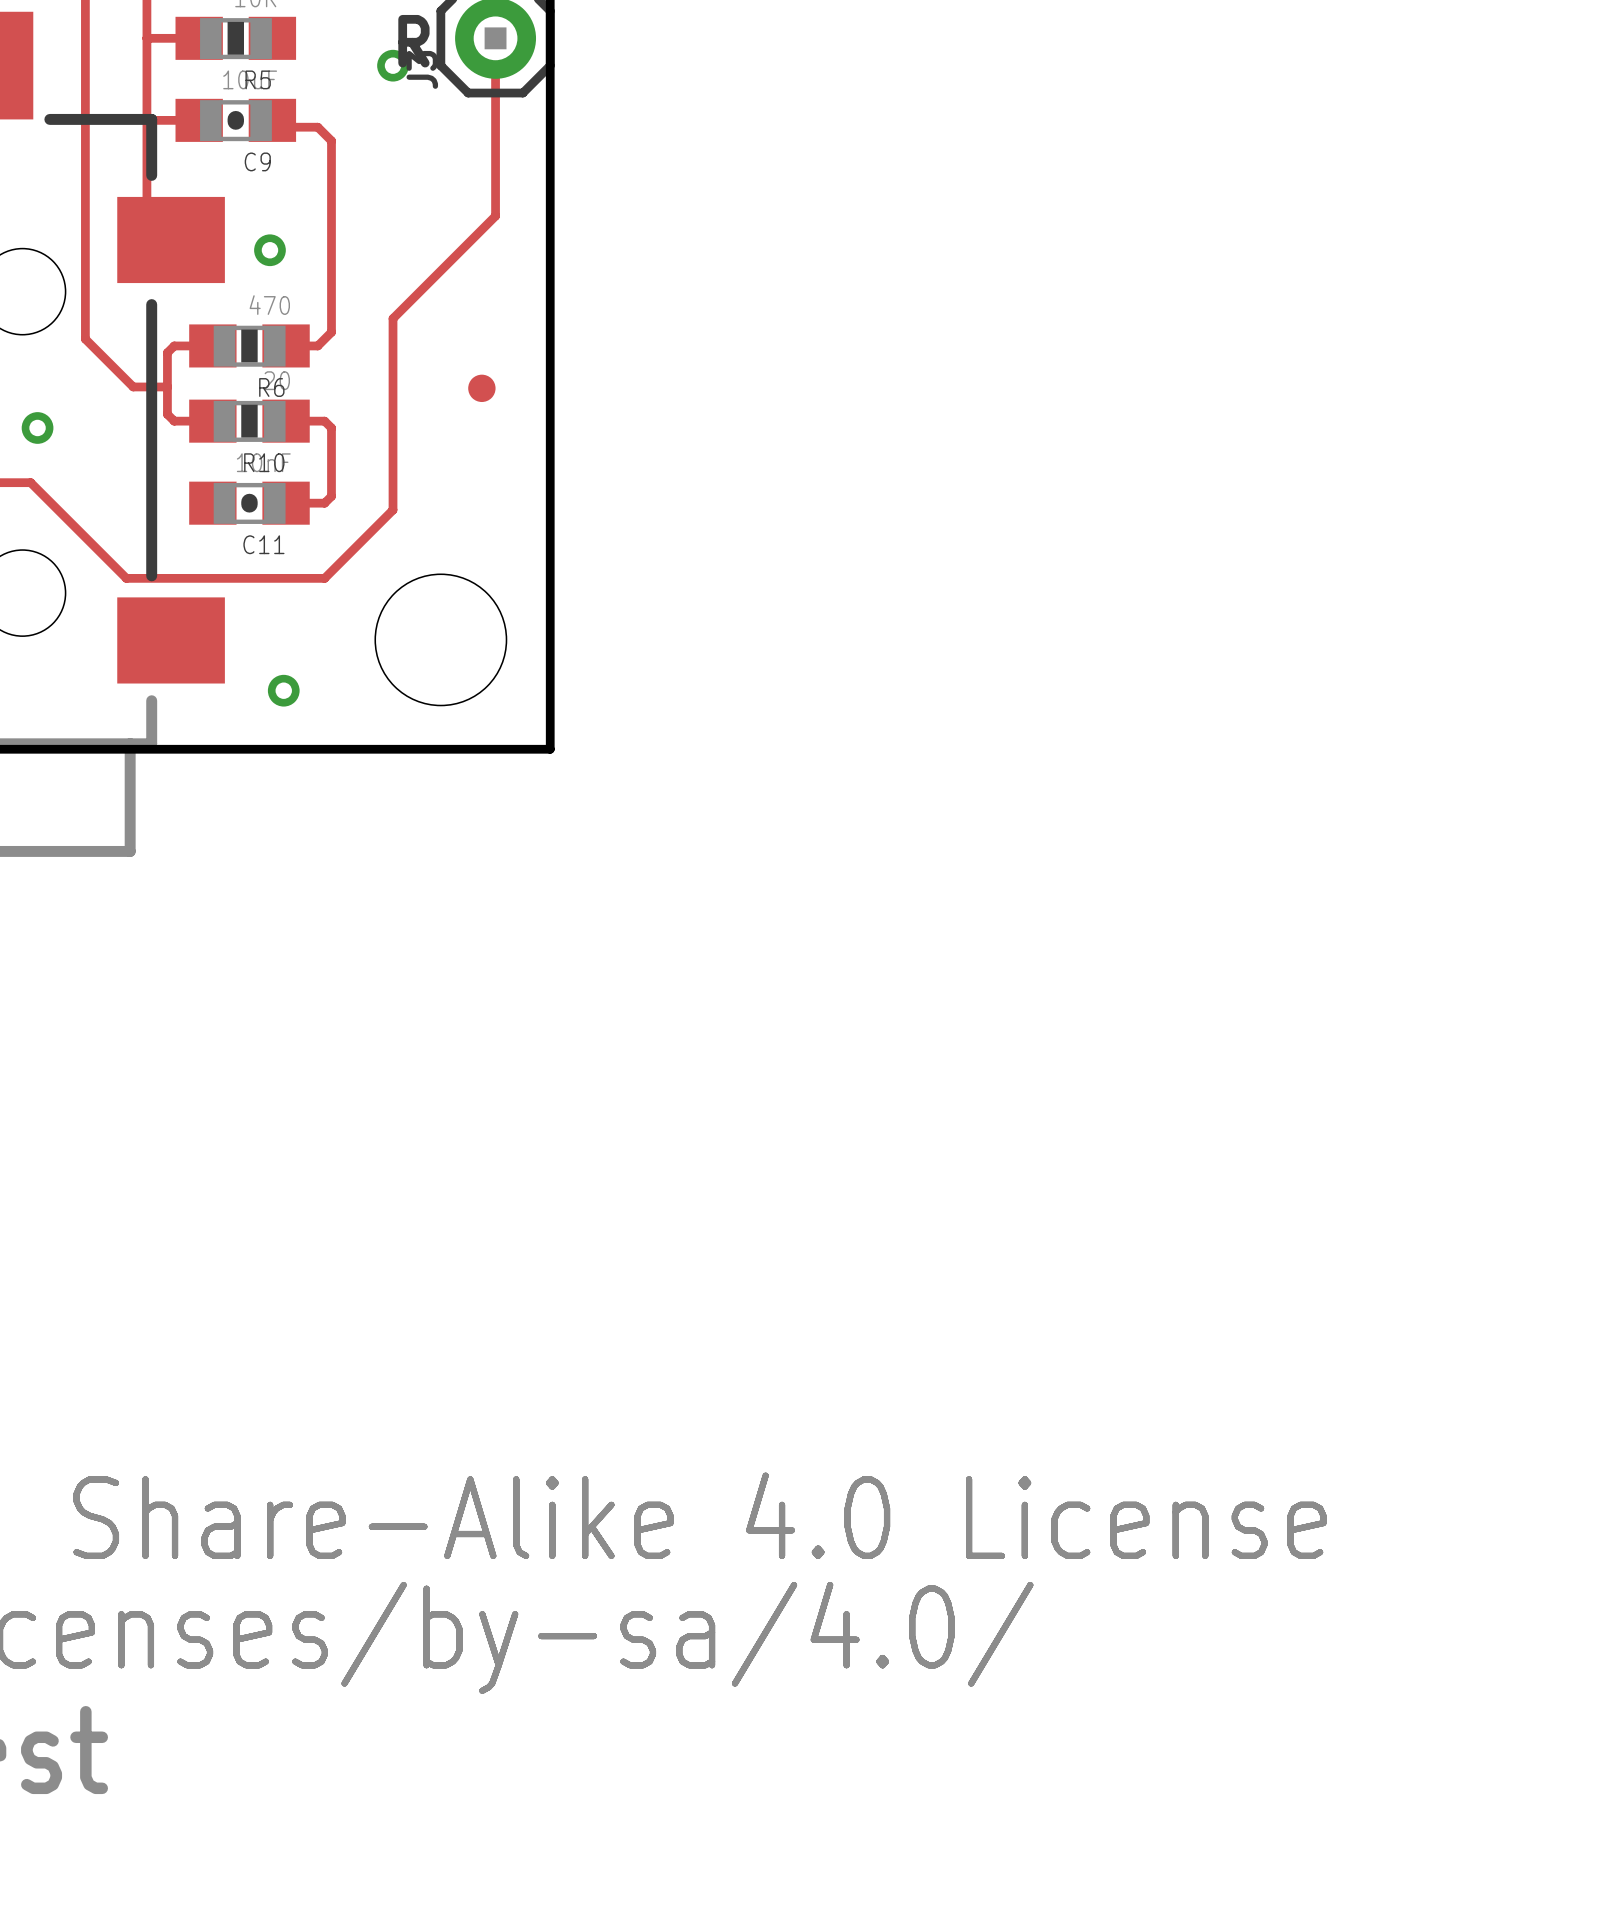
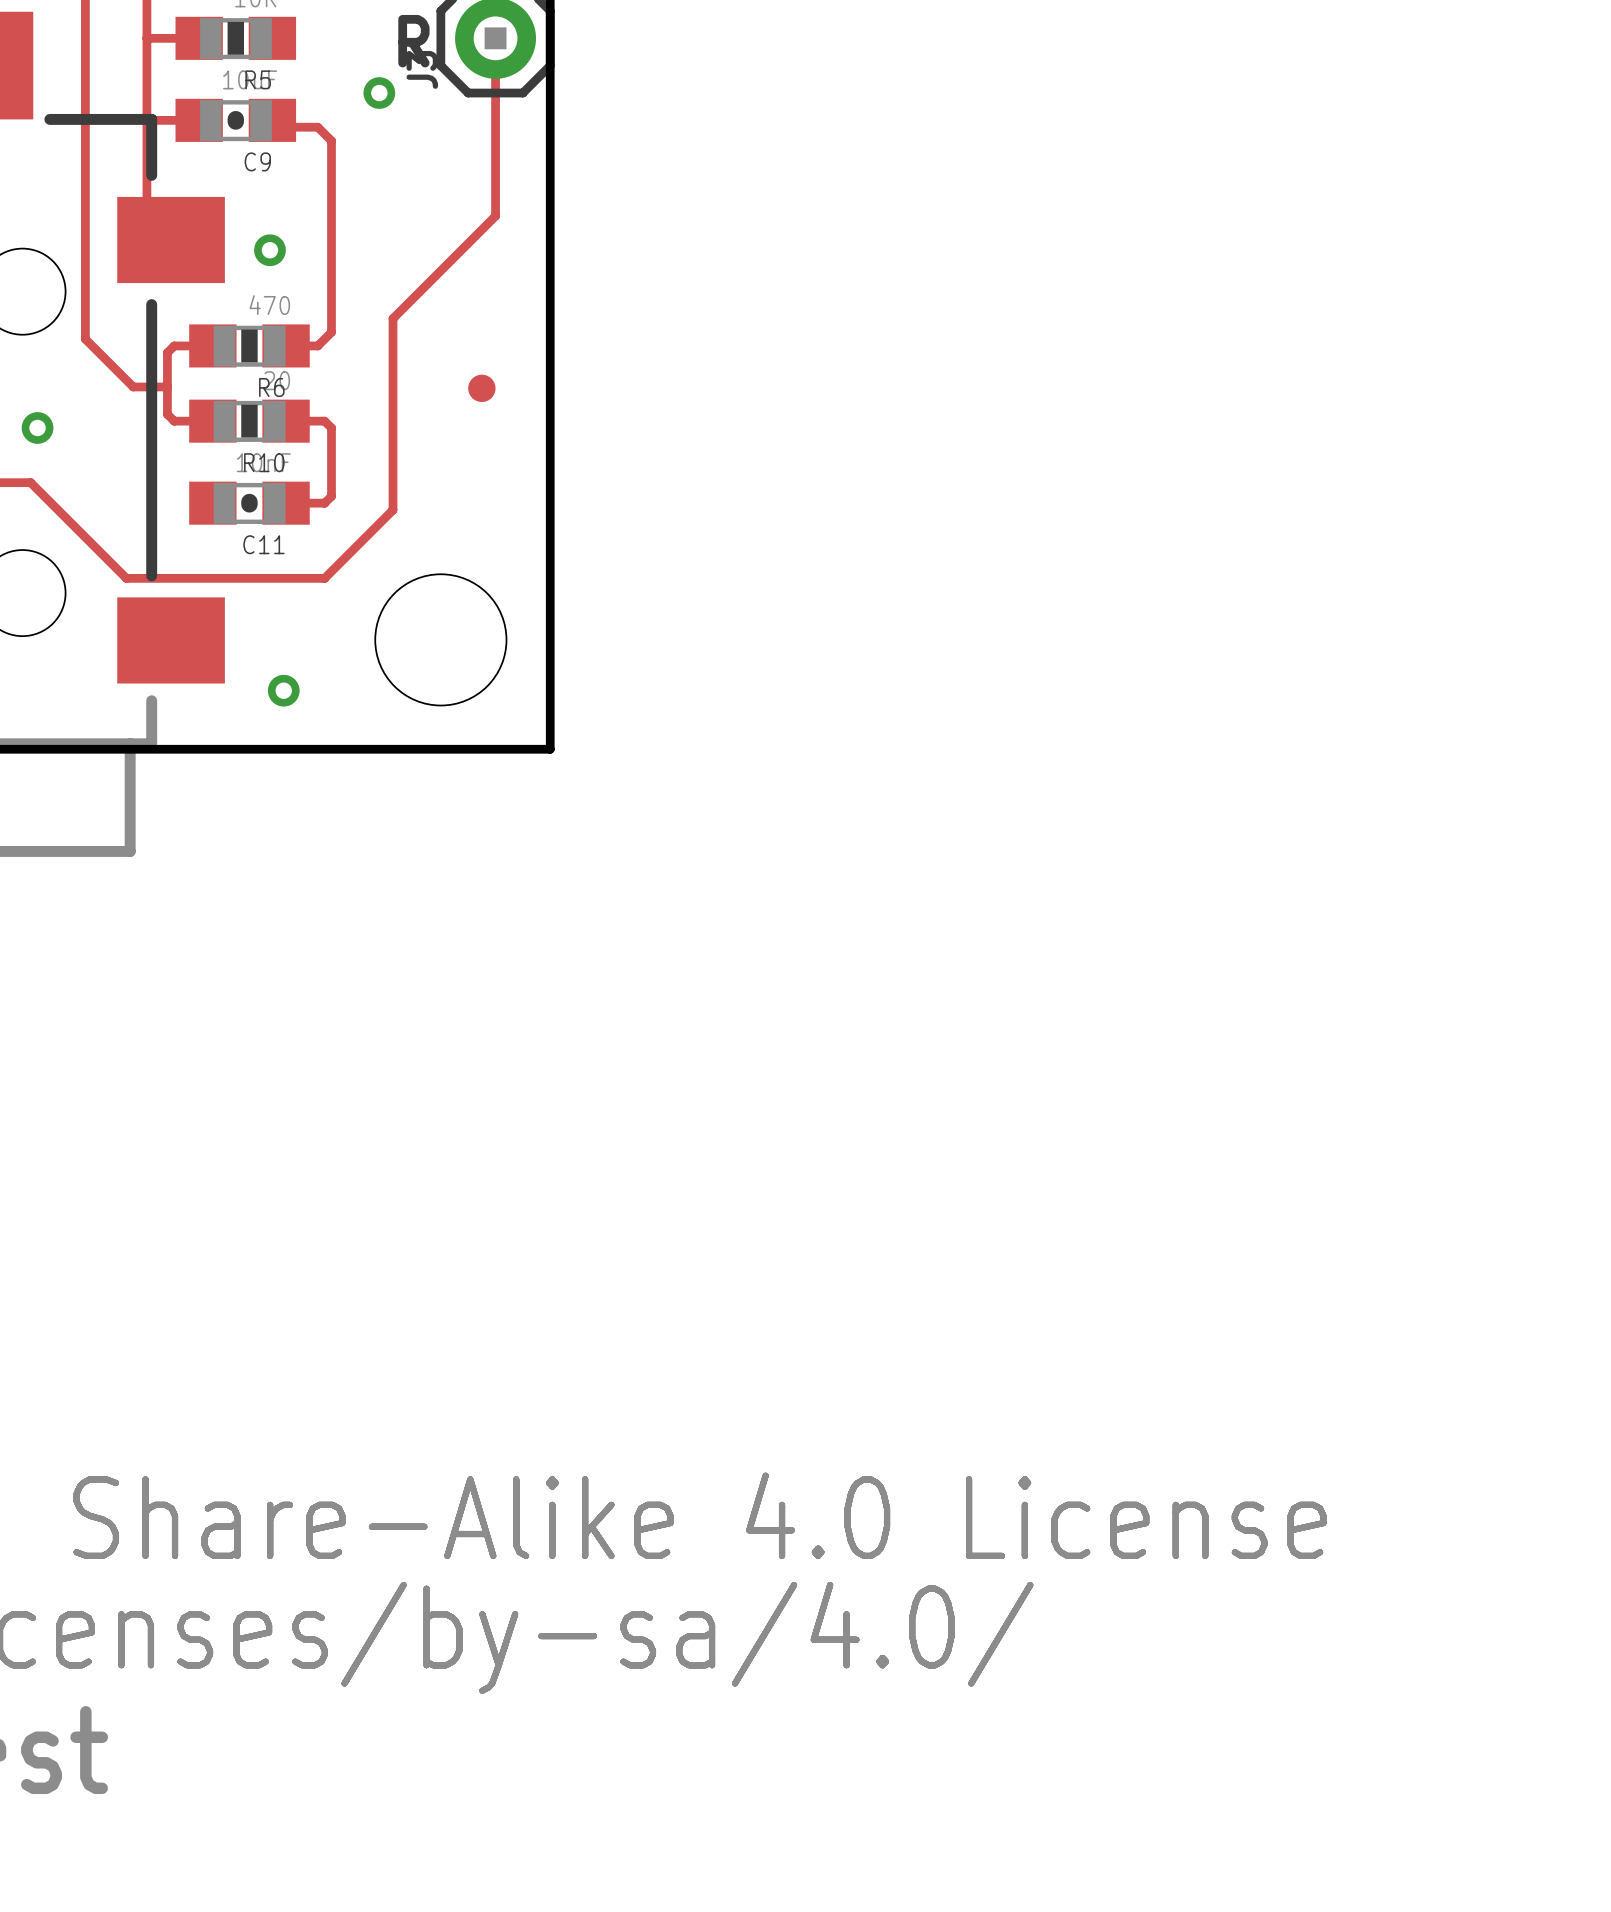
via position: (393, 65) -> (379, 93)

